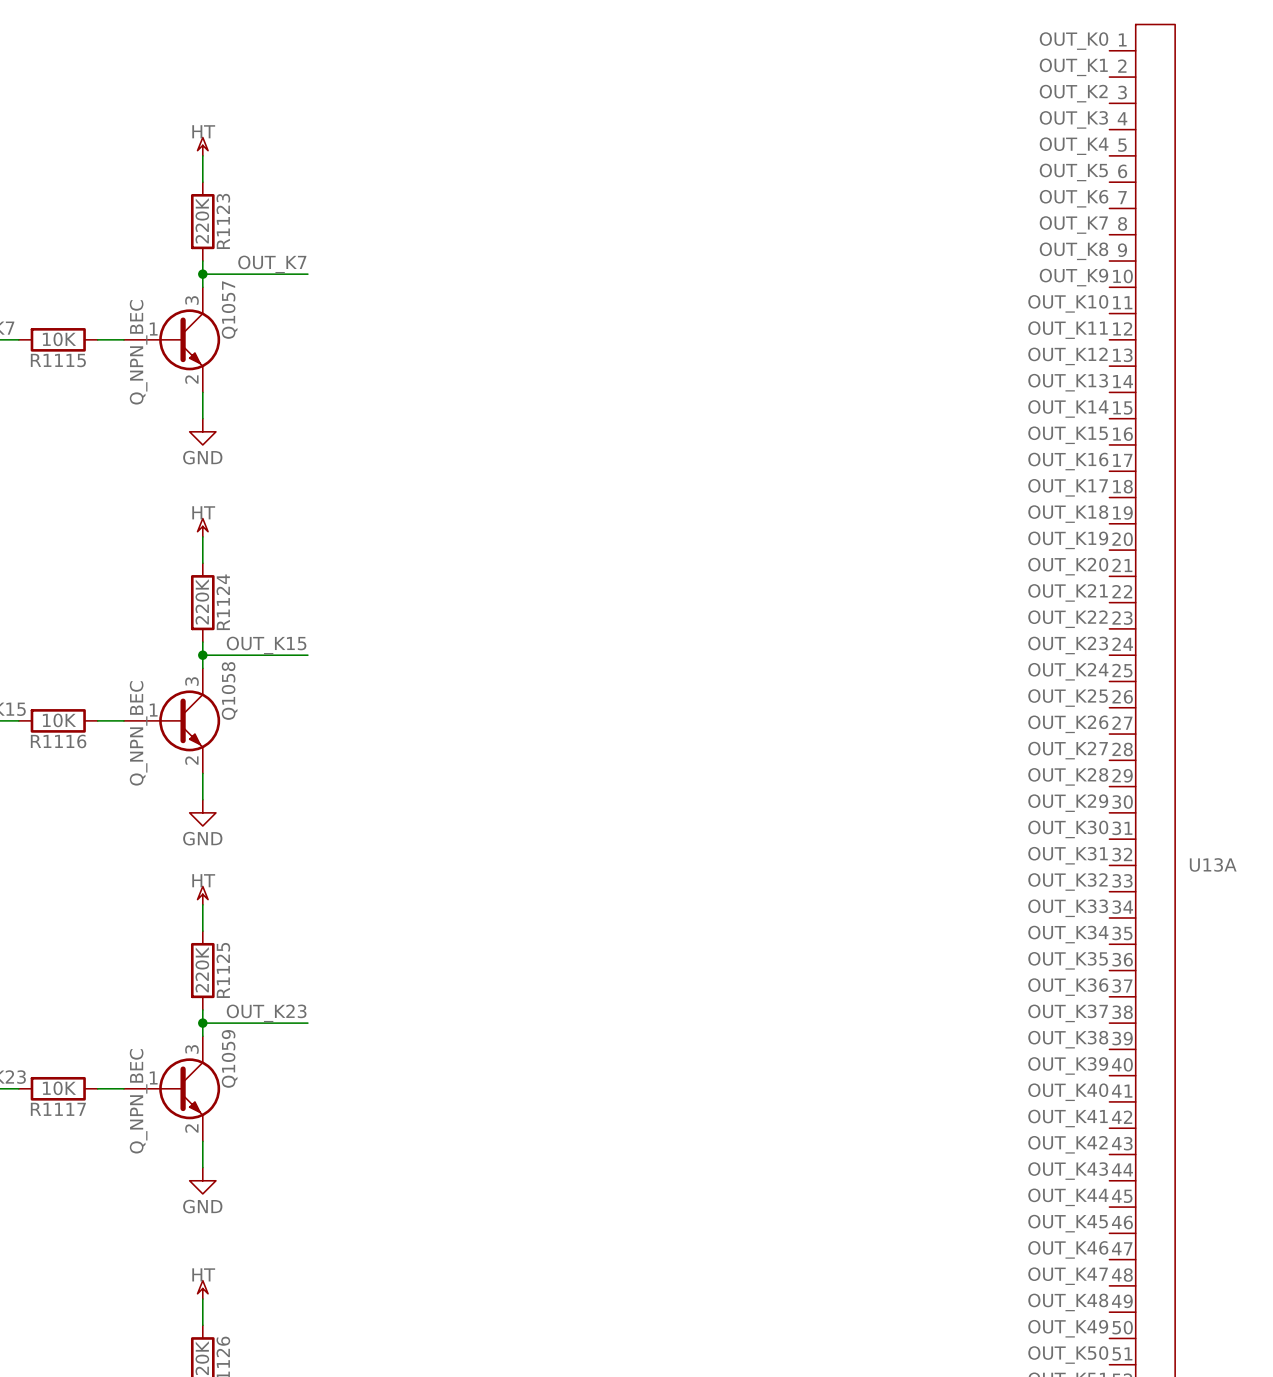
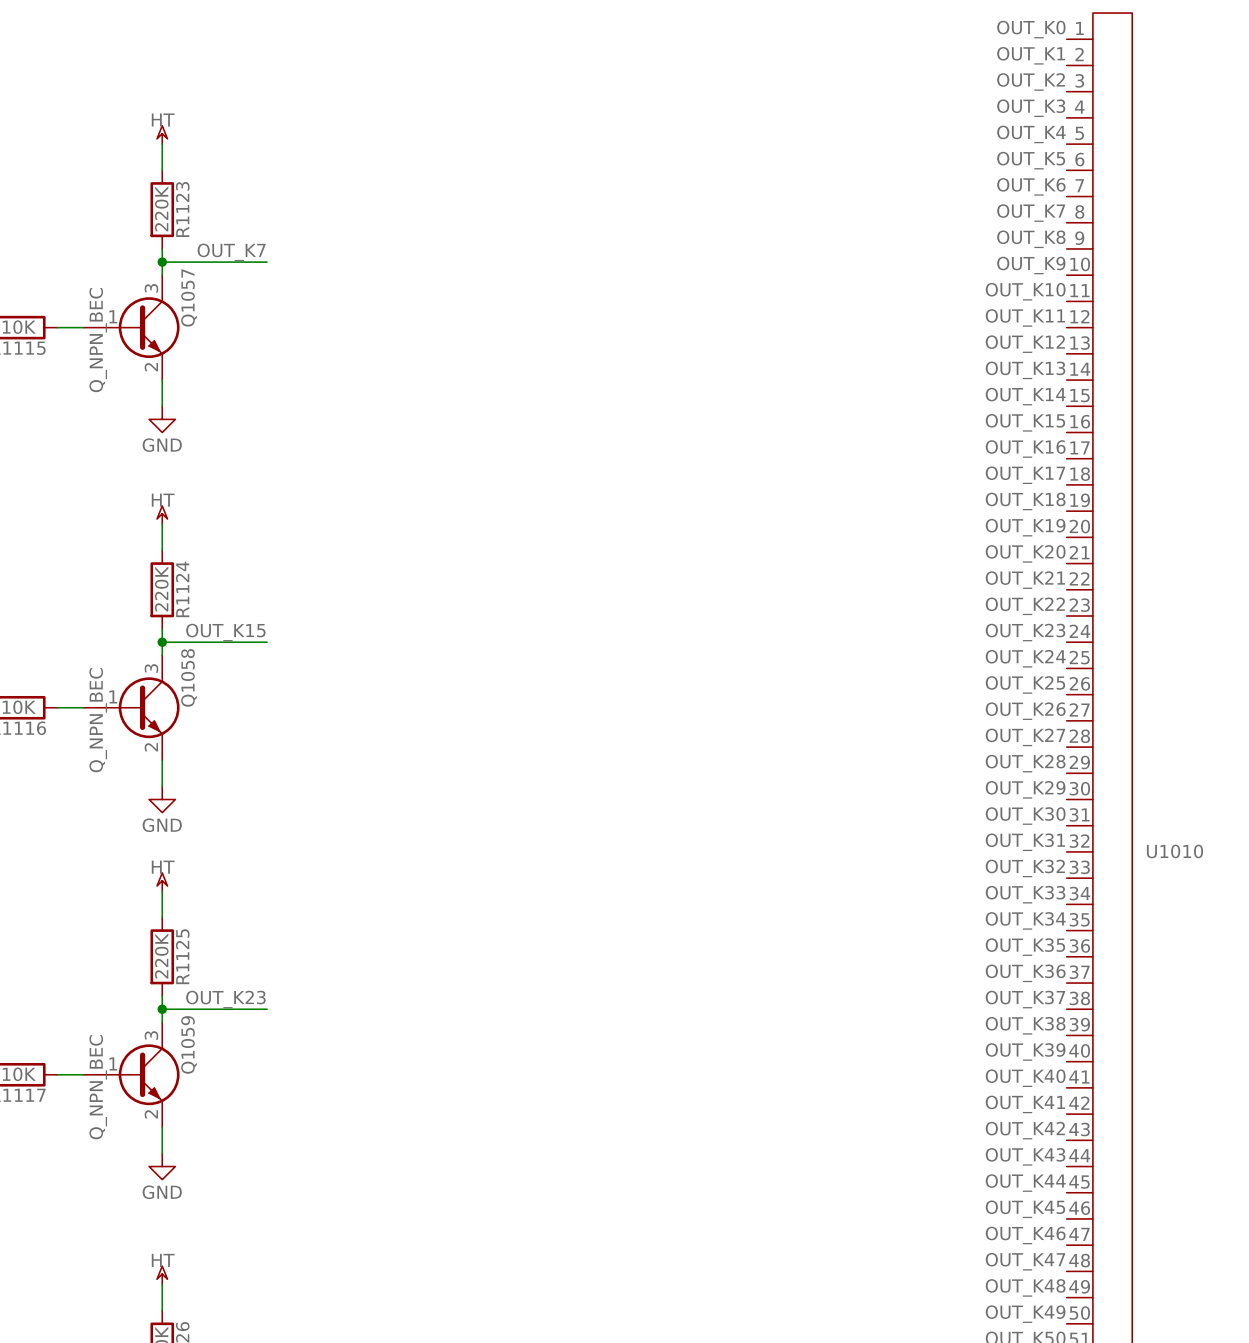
U13A name: U13A (1213, 864) -> U1010 (1174, 851)

